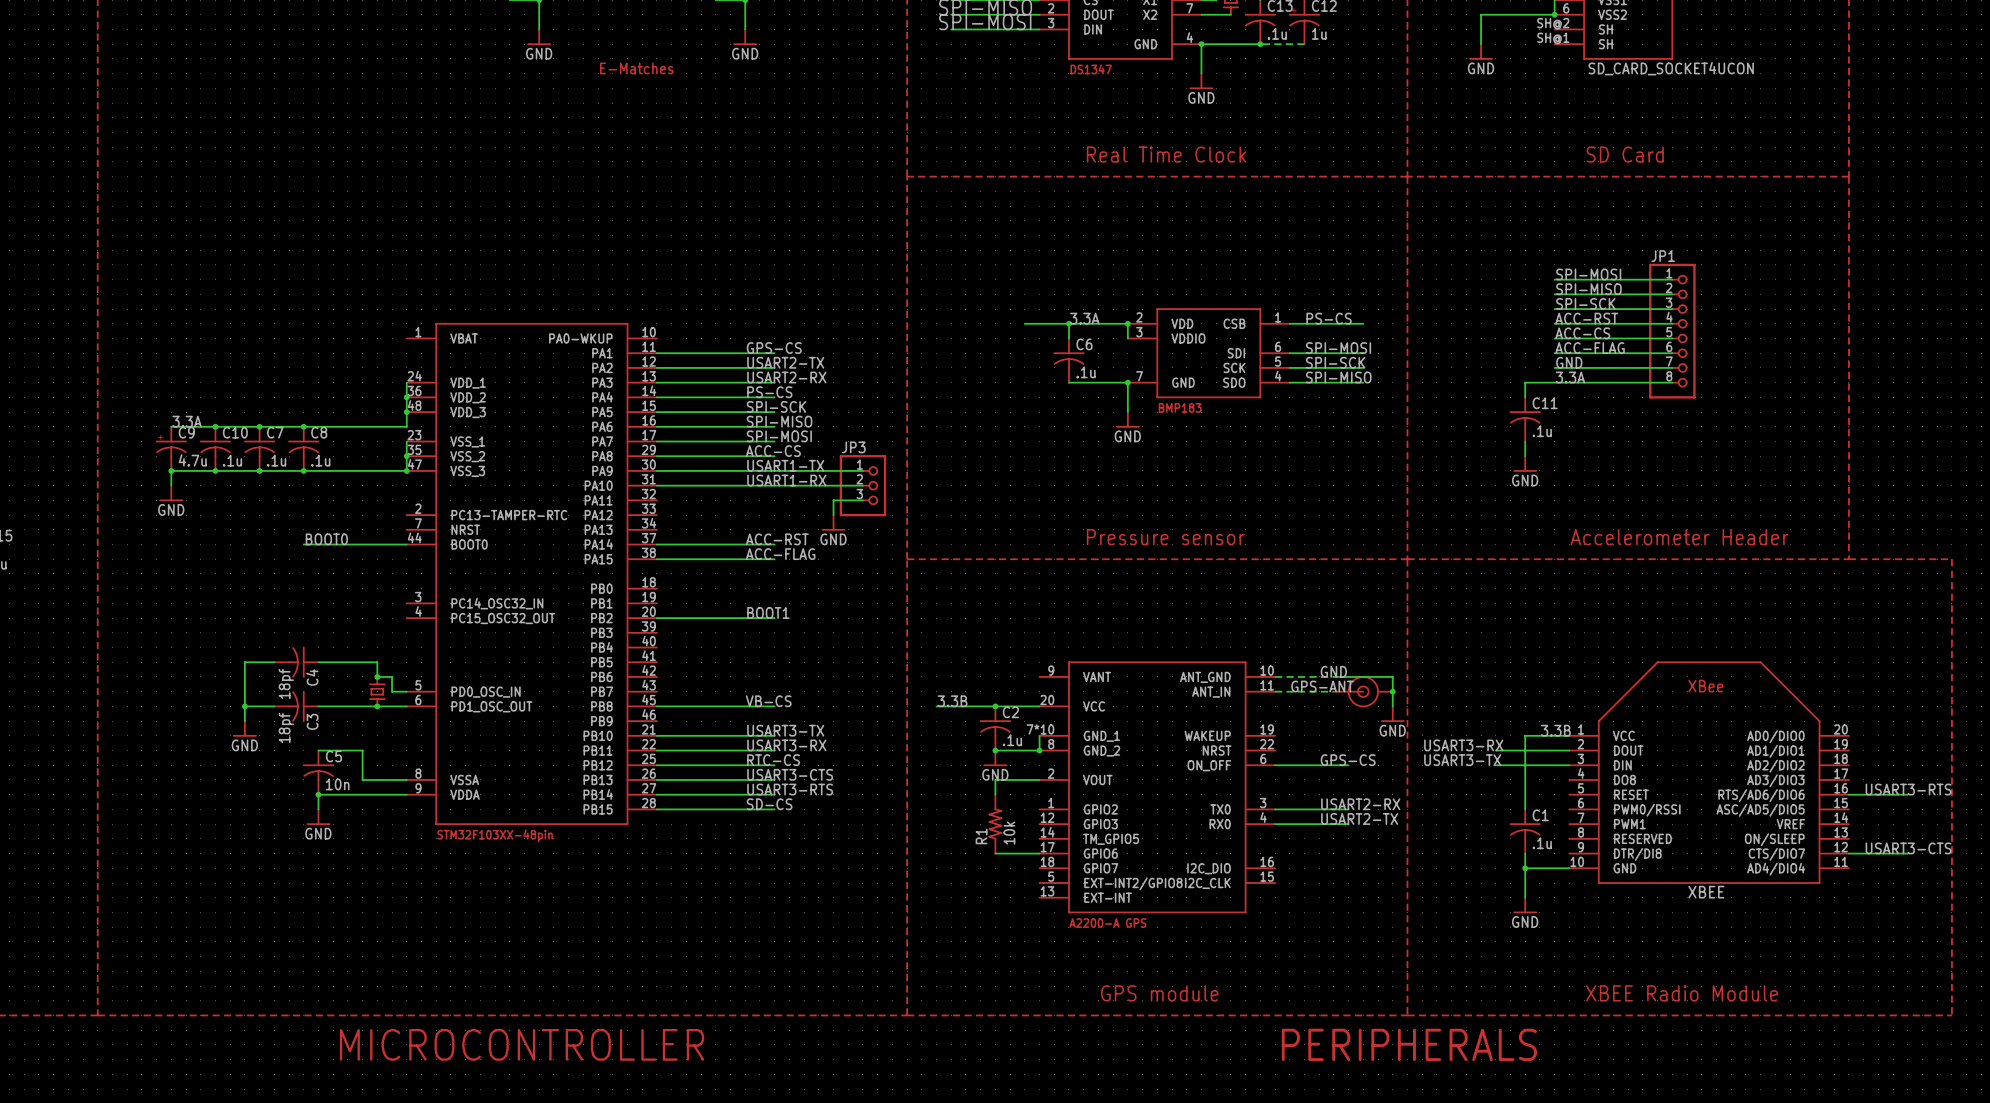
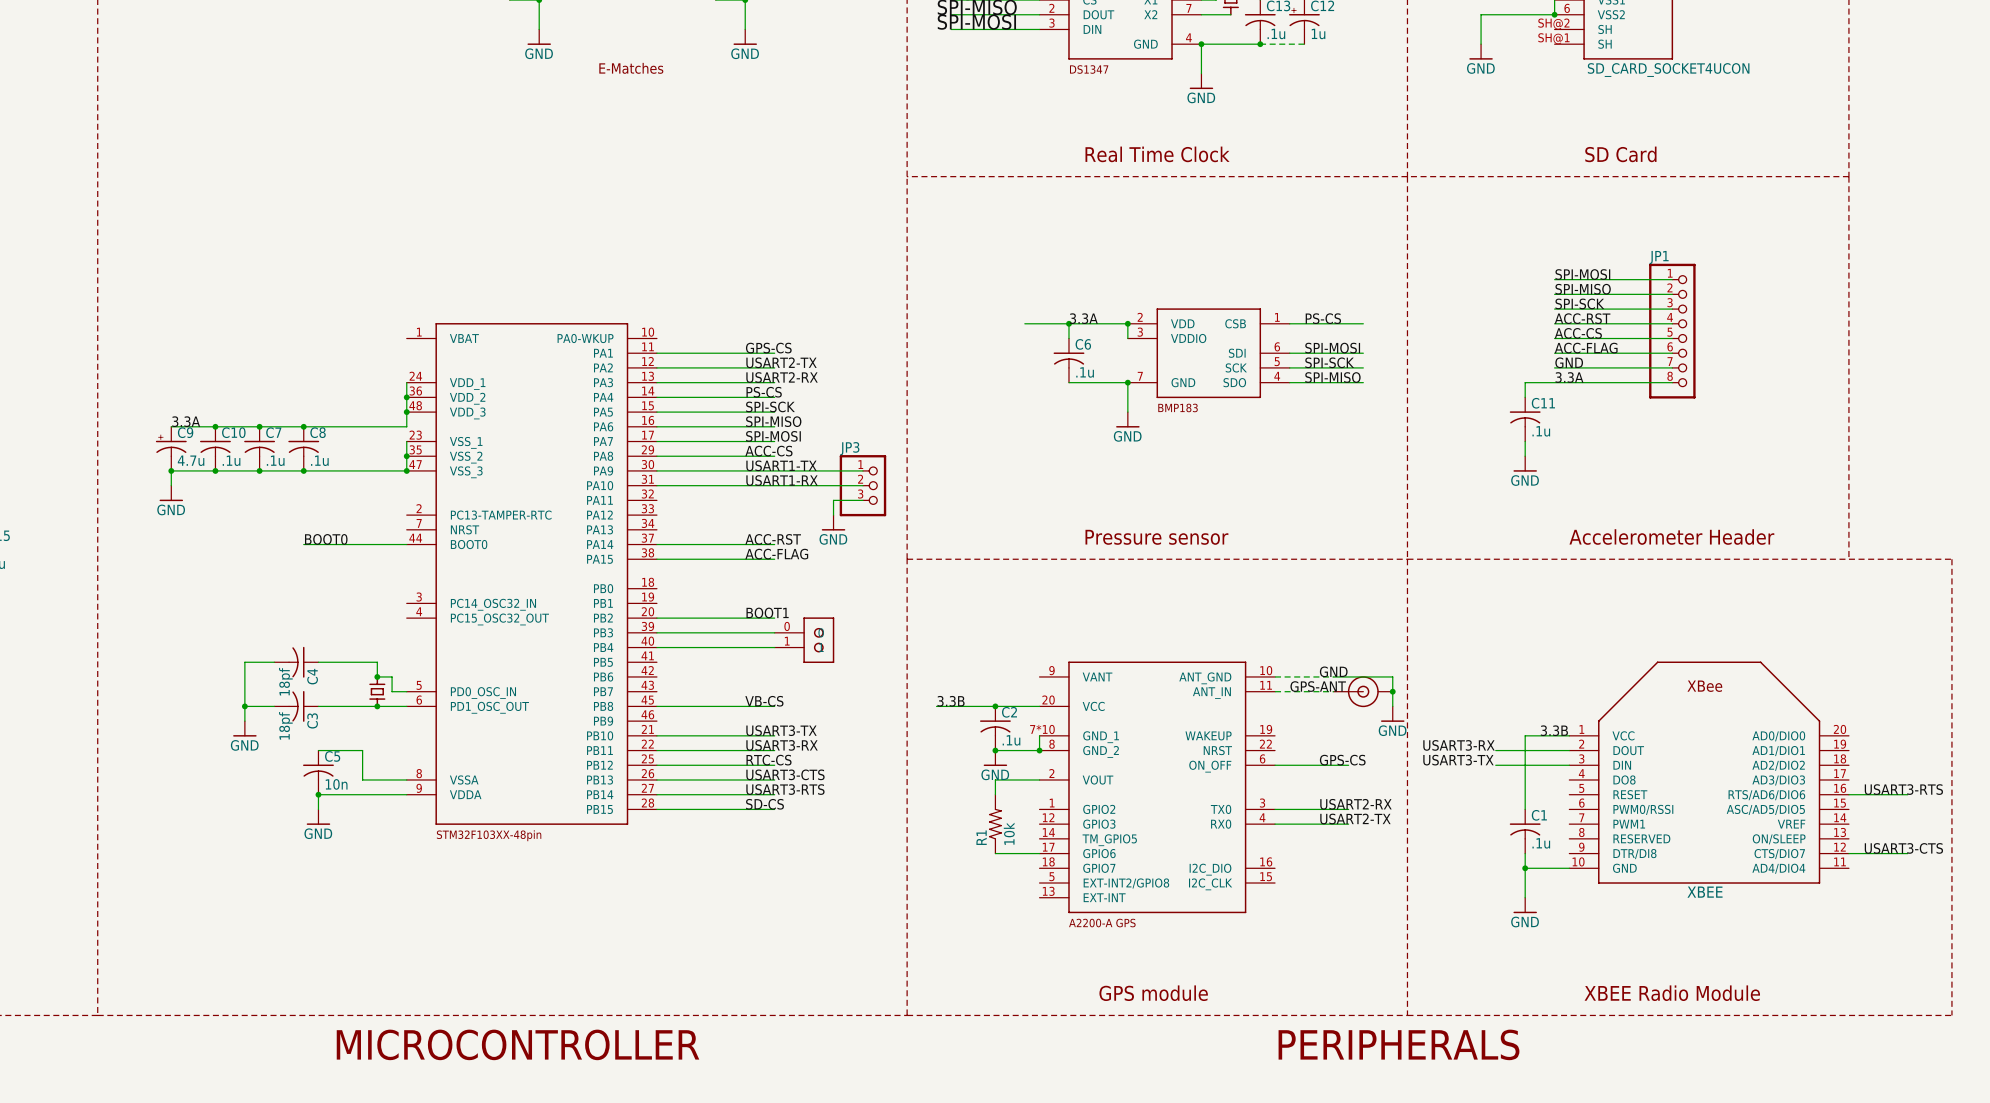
wire: none -> (656, 632) (774, 632)
part: none -> (804, 640)
wire: none -> (656, 647) (774, 647)

